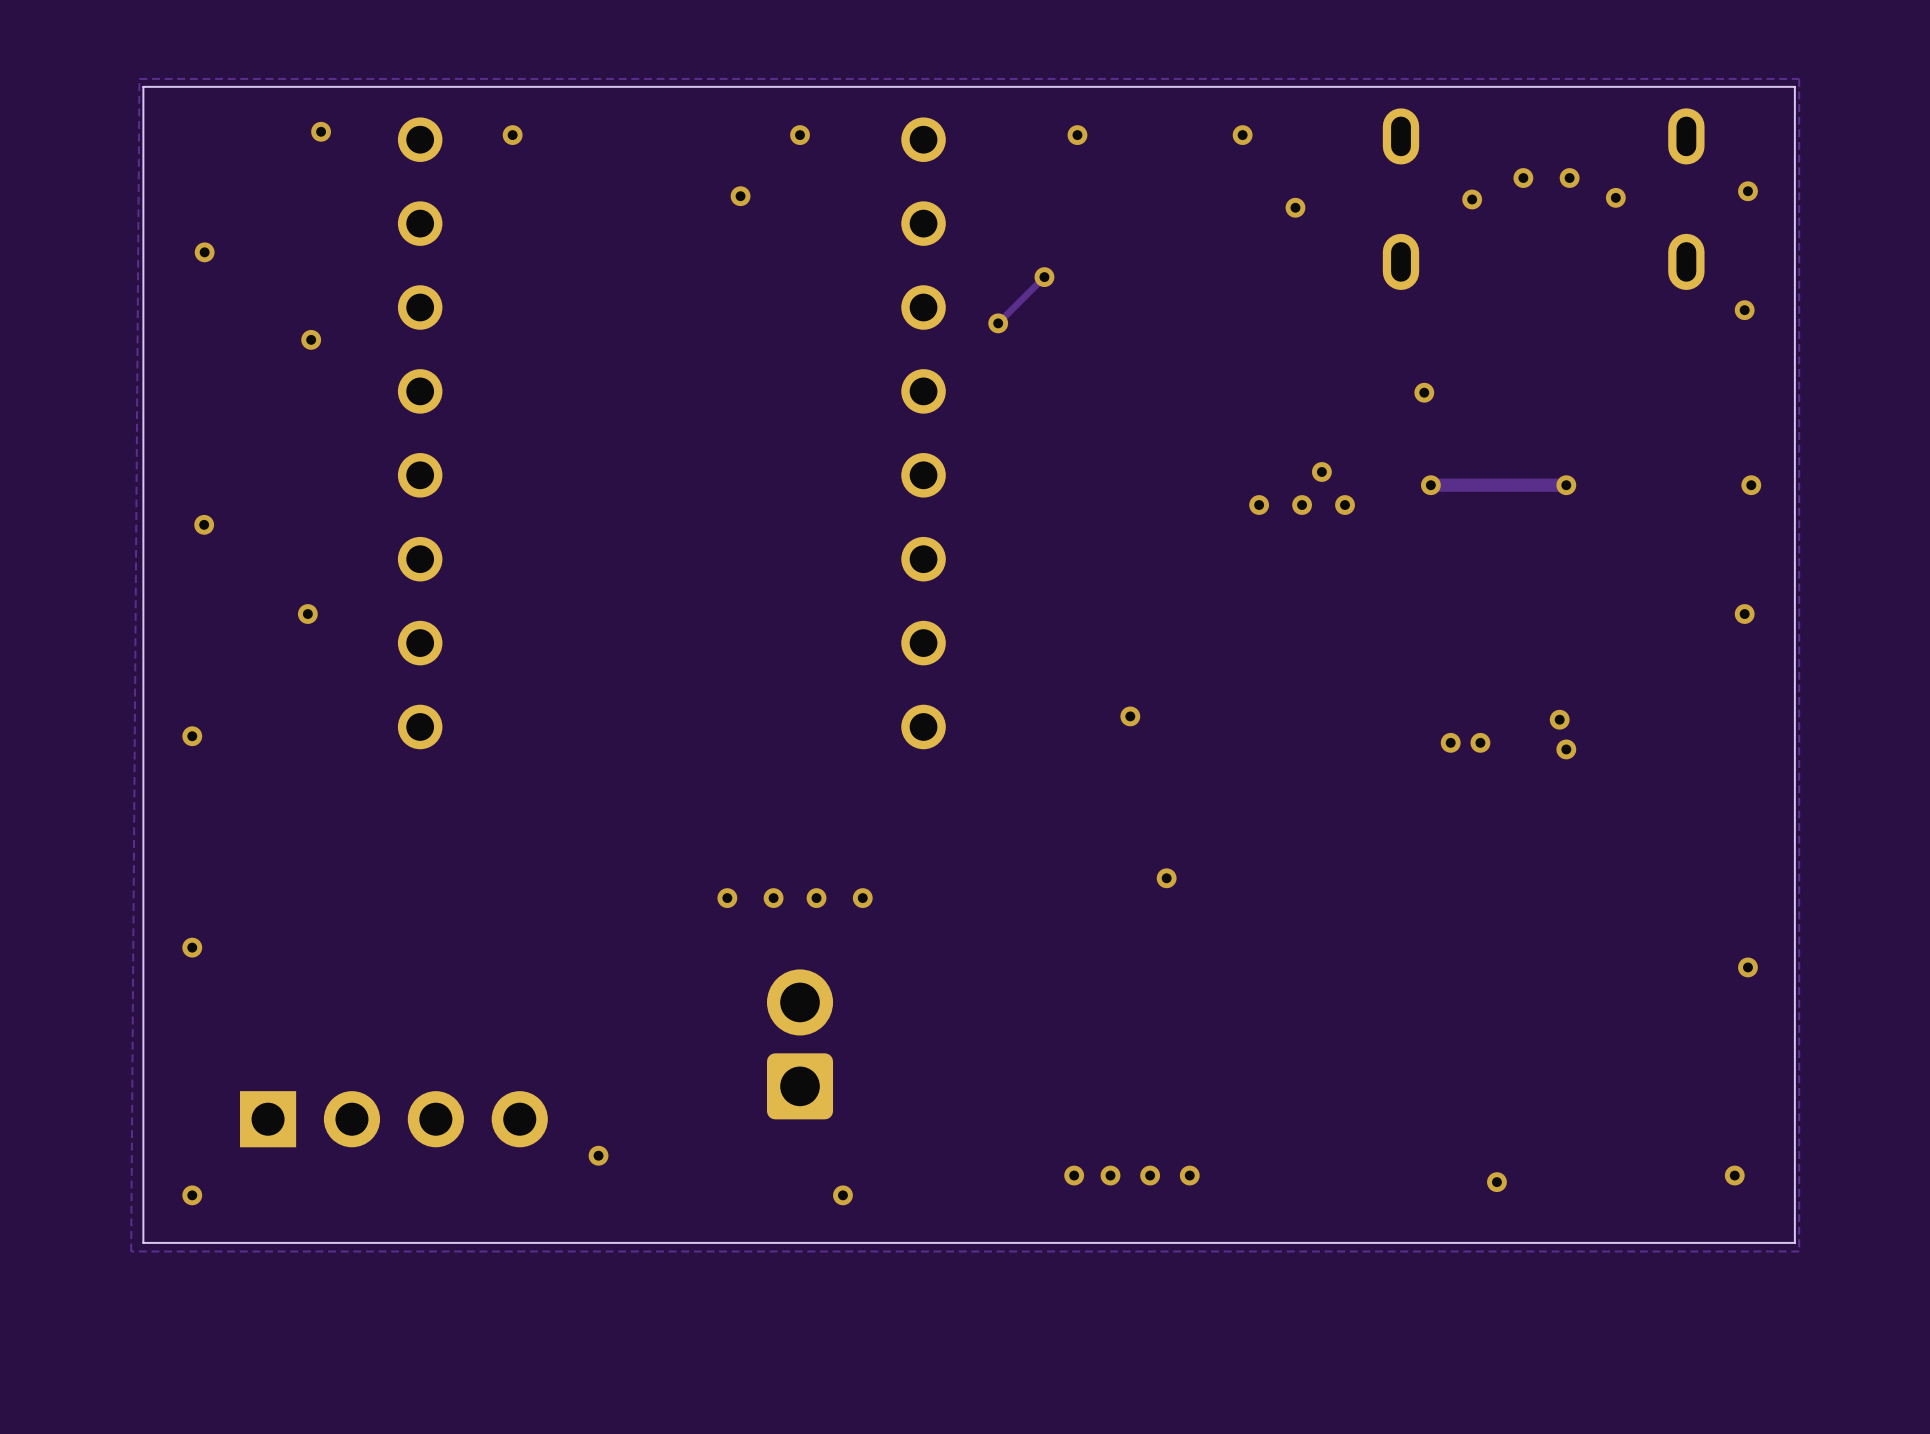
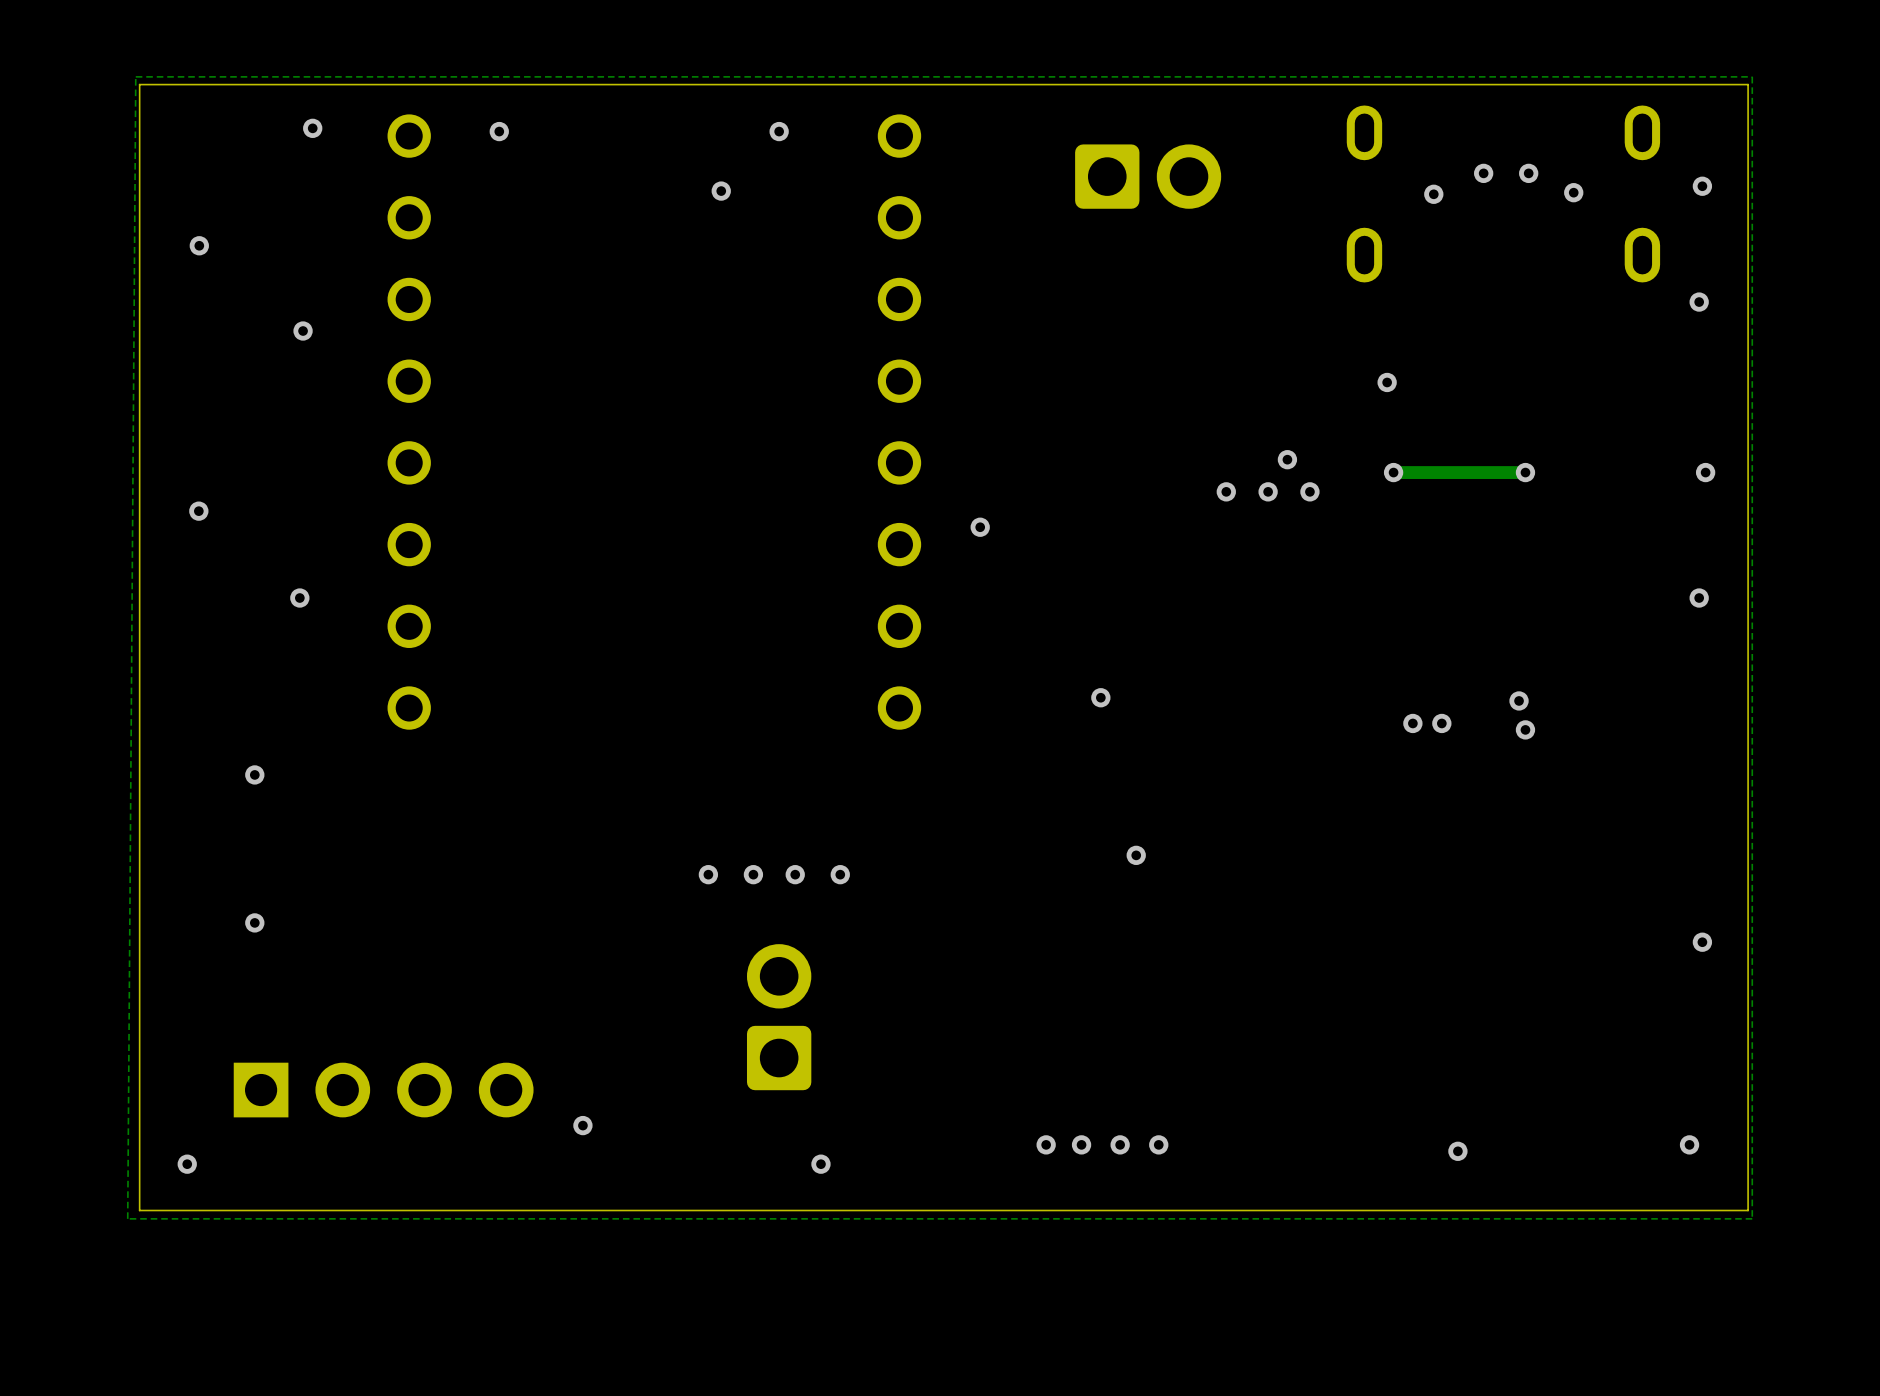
via: (1077, 135) -> none
via: (1242, 135) -> none
part: none -> (1148, 176)
via: (1295, 207) -> none
track: (1044, 277) (998, 323) -> none
via: (1044, 277) -> none
via: (998, 323) -> none
via: none -> (980, 527)
via: (192, 736) -> none
via: none -> (254, 774)
via position: (192, 947) -> (254, 922)

